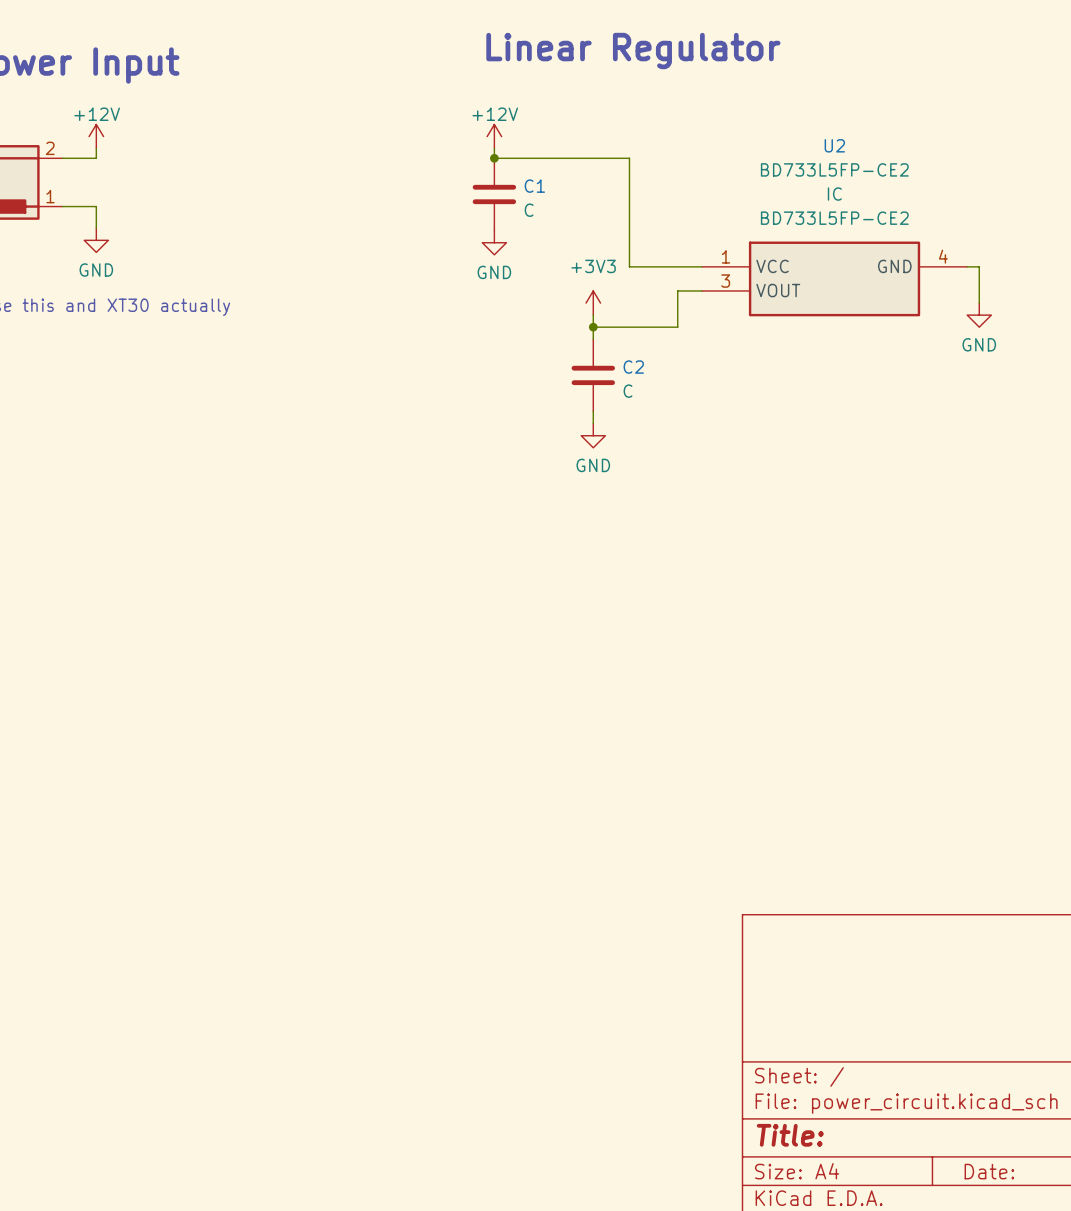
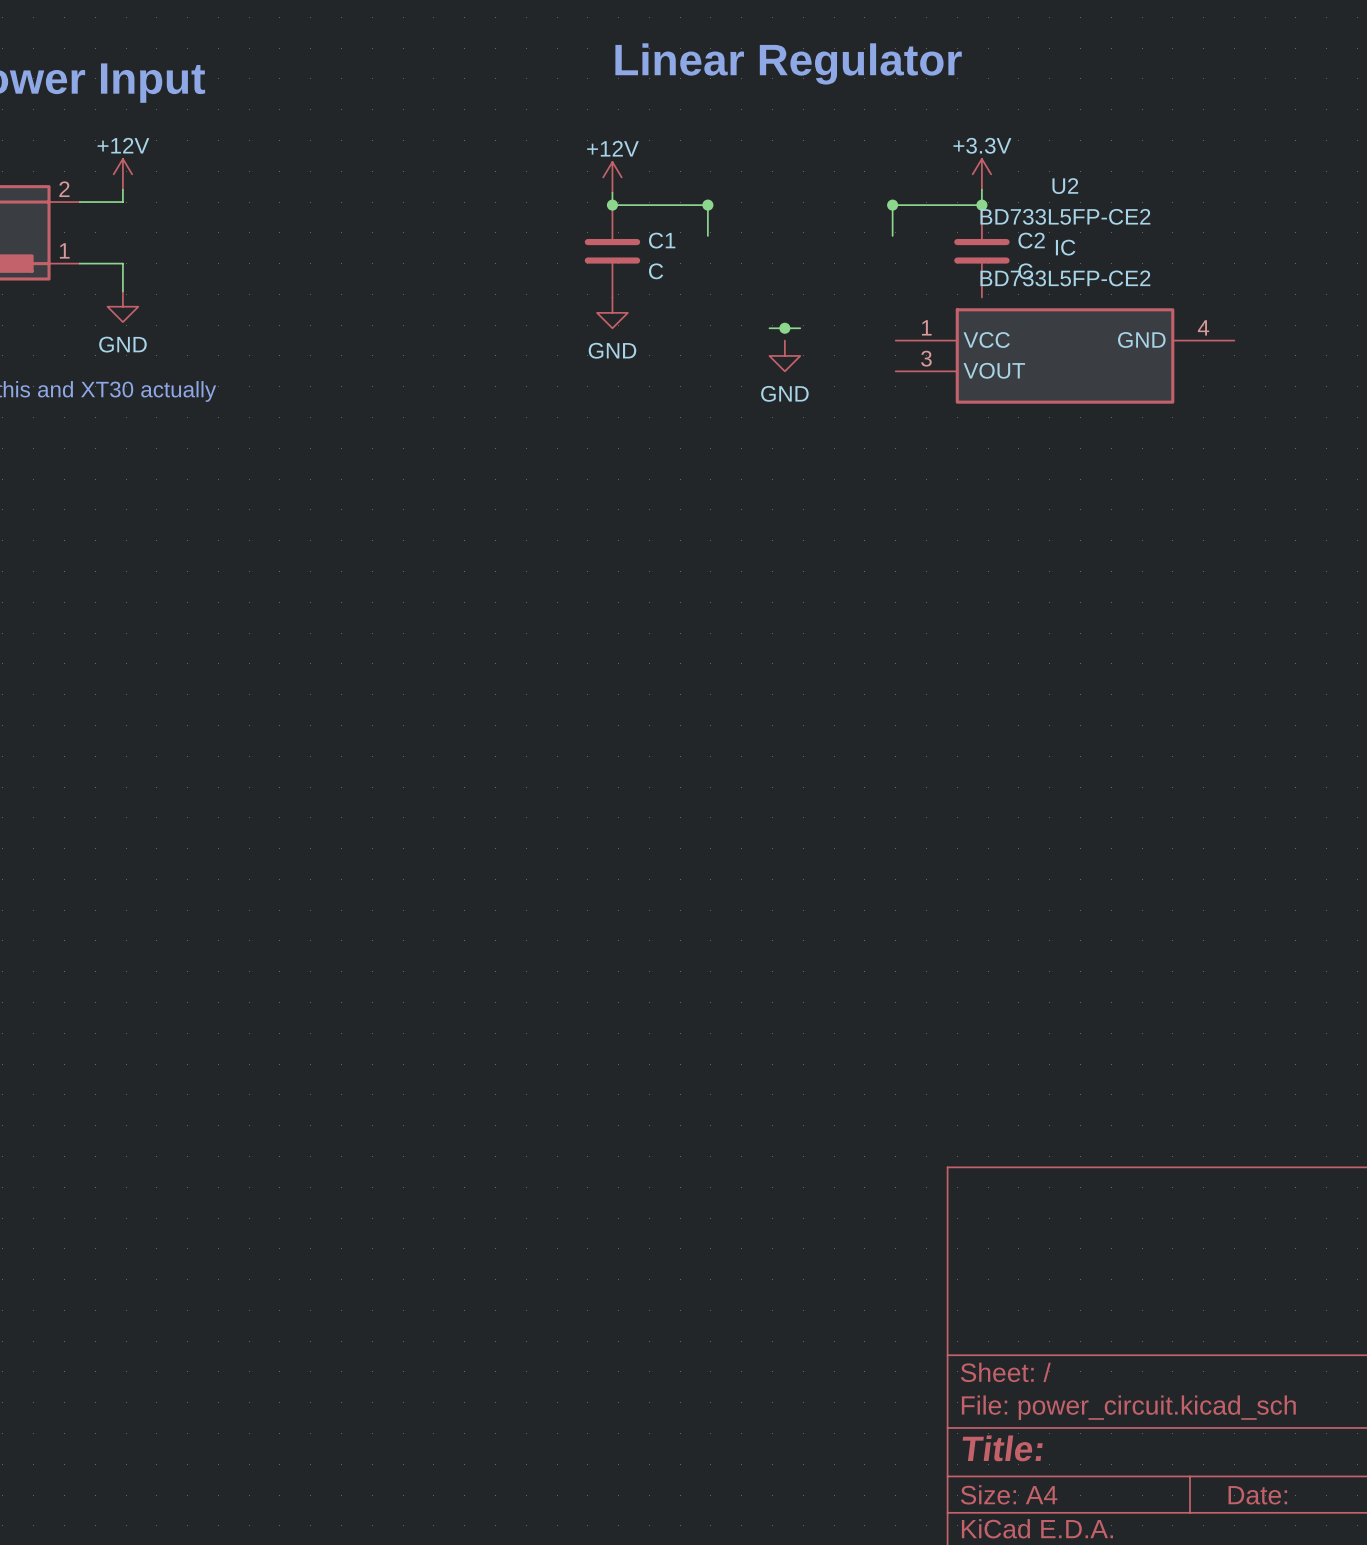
power symbol position: +12V (494, 136) -> +12V (612, 177)
power symbol: none -> +3.3V (981, 174)
wire: (494, 148) (494, 158) (629, 158) (629, 266) (701, 266) -> none
wire: none -> (981, 189) (981, 205) (892, 205) (892, 235)
wire: none -> (612, 192) (612, 205) (707, 205) (707, 235)
junction position: (494, 158) -> (612, 205)
junction: none -> (707, 205)
junction: none -> (892, 205)
junction: none -> (981, 205)
C1 position: (494, 194) -> (612, 251)
power symbol position: GND (494, 242) -> GND (612, 312)
wire: none -> (769, 328) (800, 328)
junction: none -> (784, 328)
wire: (967, 266) (979, 266) (979, 303) -> none
power symbol: none -> GND (784, 355)
wire: (701, 290) (677, 290) (677, 327) (593, 327) -> none
power symbol: +3V3 (593, 303) -> none
wire: (593, 315) (593, 339) -> none
power symbol: GND (979, 315) -> none
junction: (593, 327) -> none
C2 position: (593, 375) -> (981, 251)
wire: (593, 411) (593, 423) -> none
power symbol: GND (593, 435) -> none

